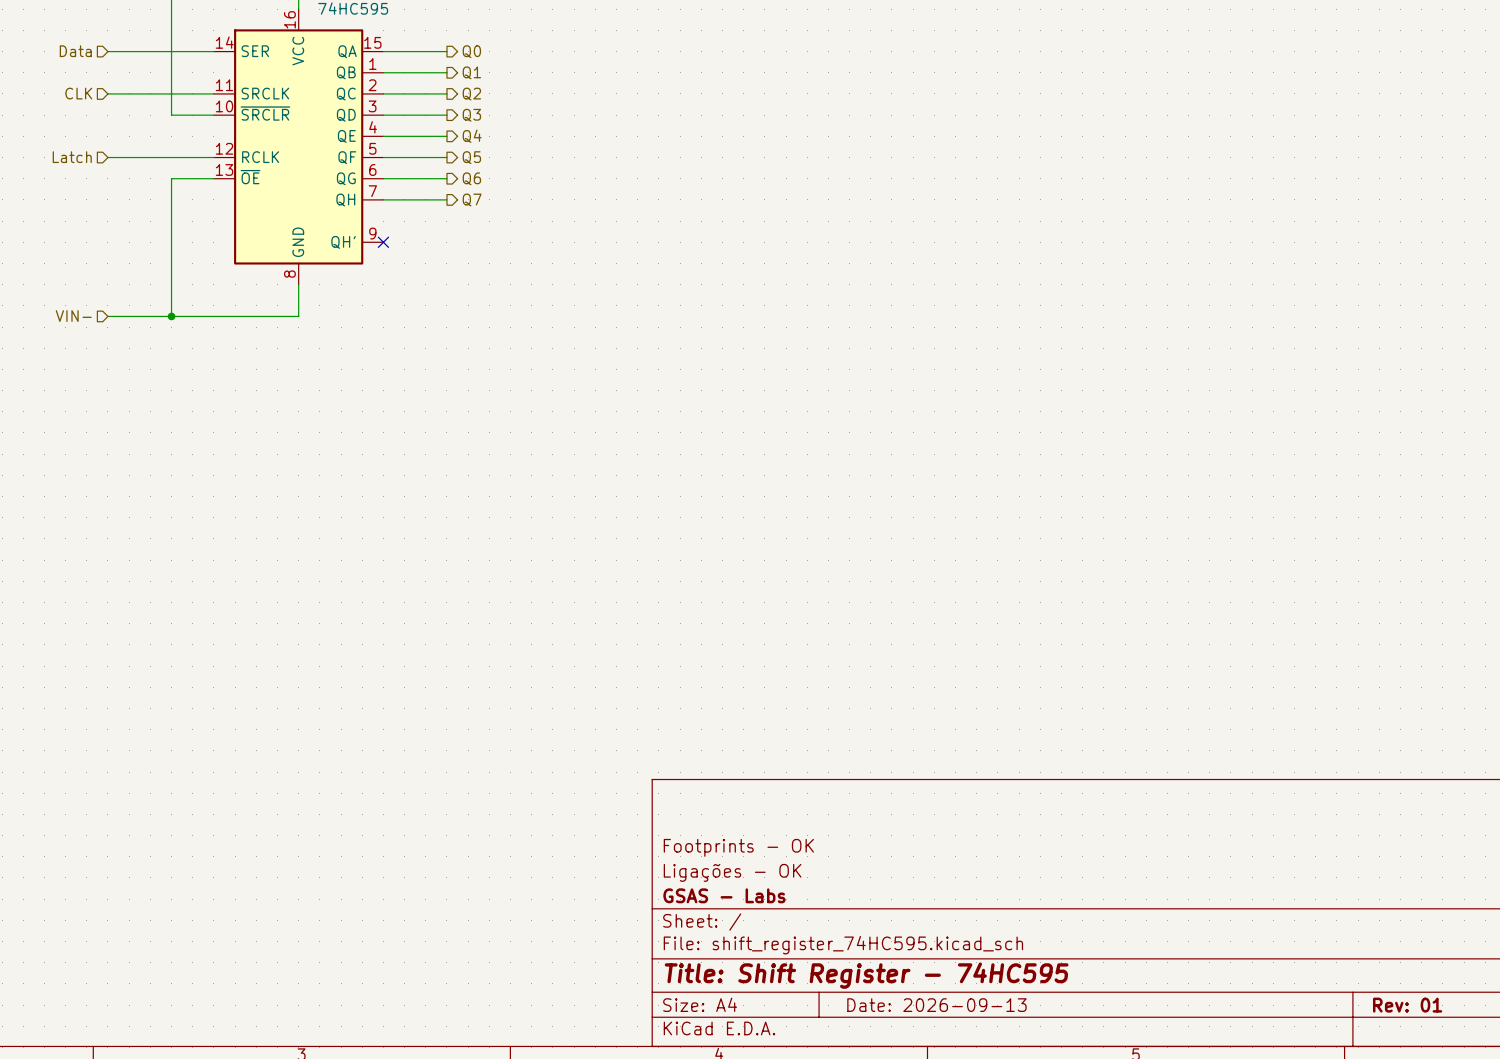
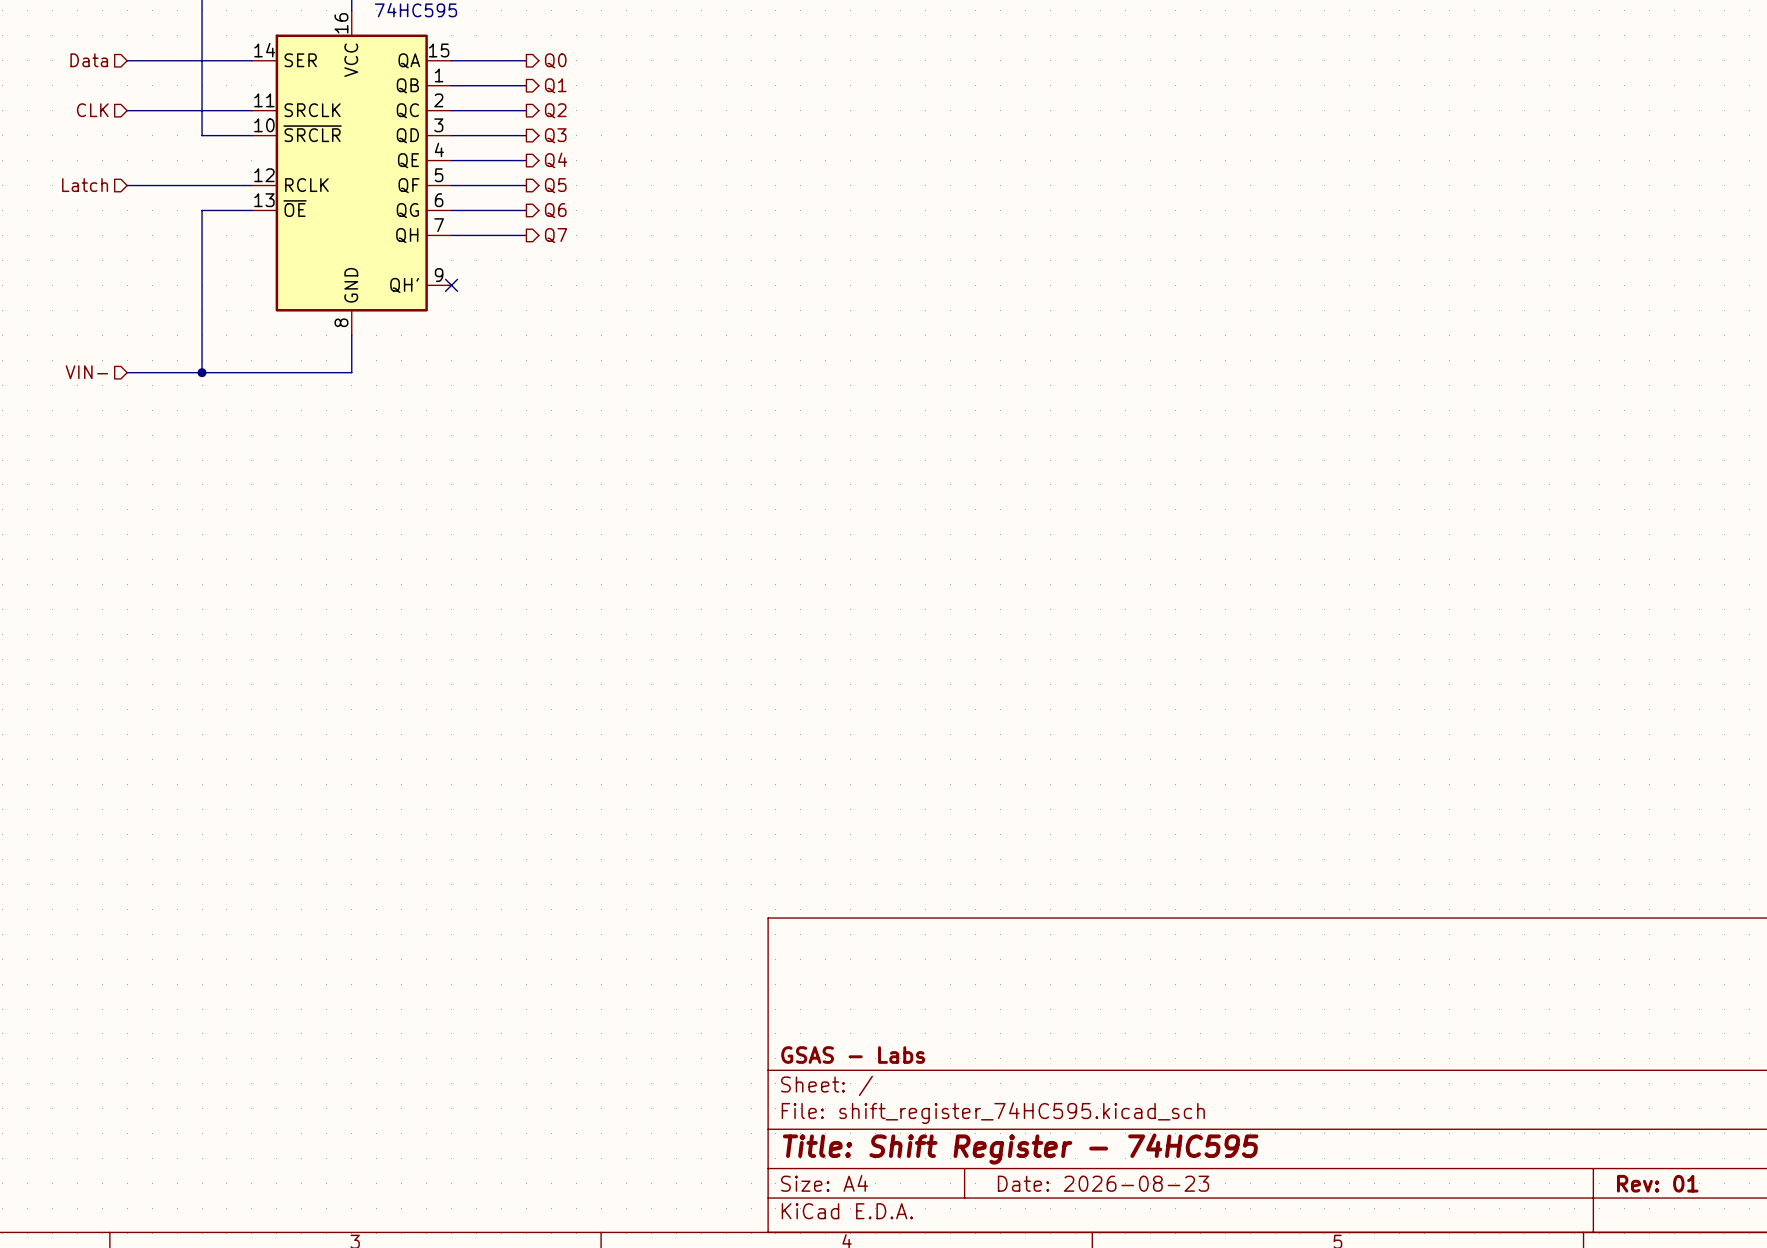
title block: Footprints - OK (738, 847) -> none
title block: Ligações - OK (732, 872) -> none
title block: Date: 2026-09-13 (936, 1005) -> Date: 2026-08-23 (1103, 1183)

